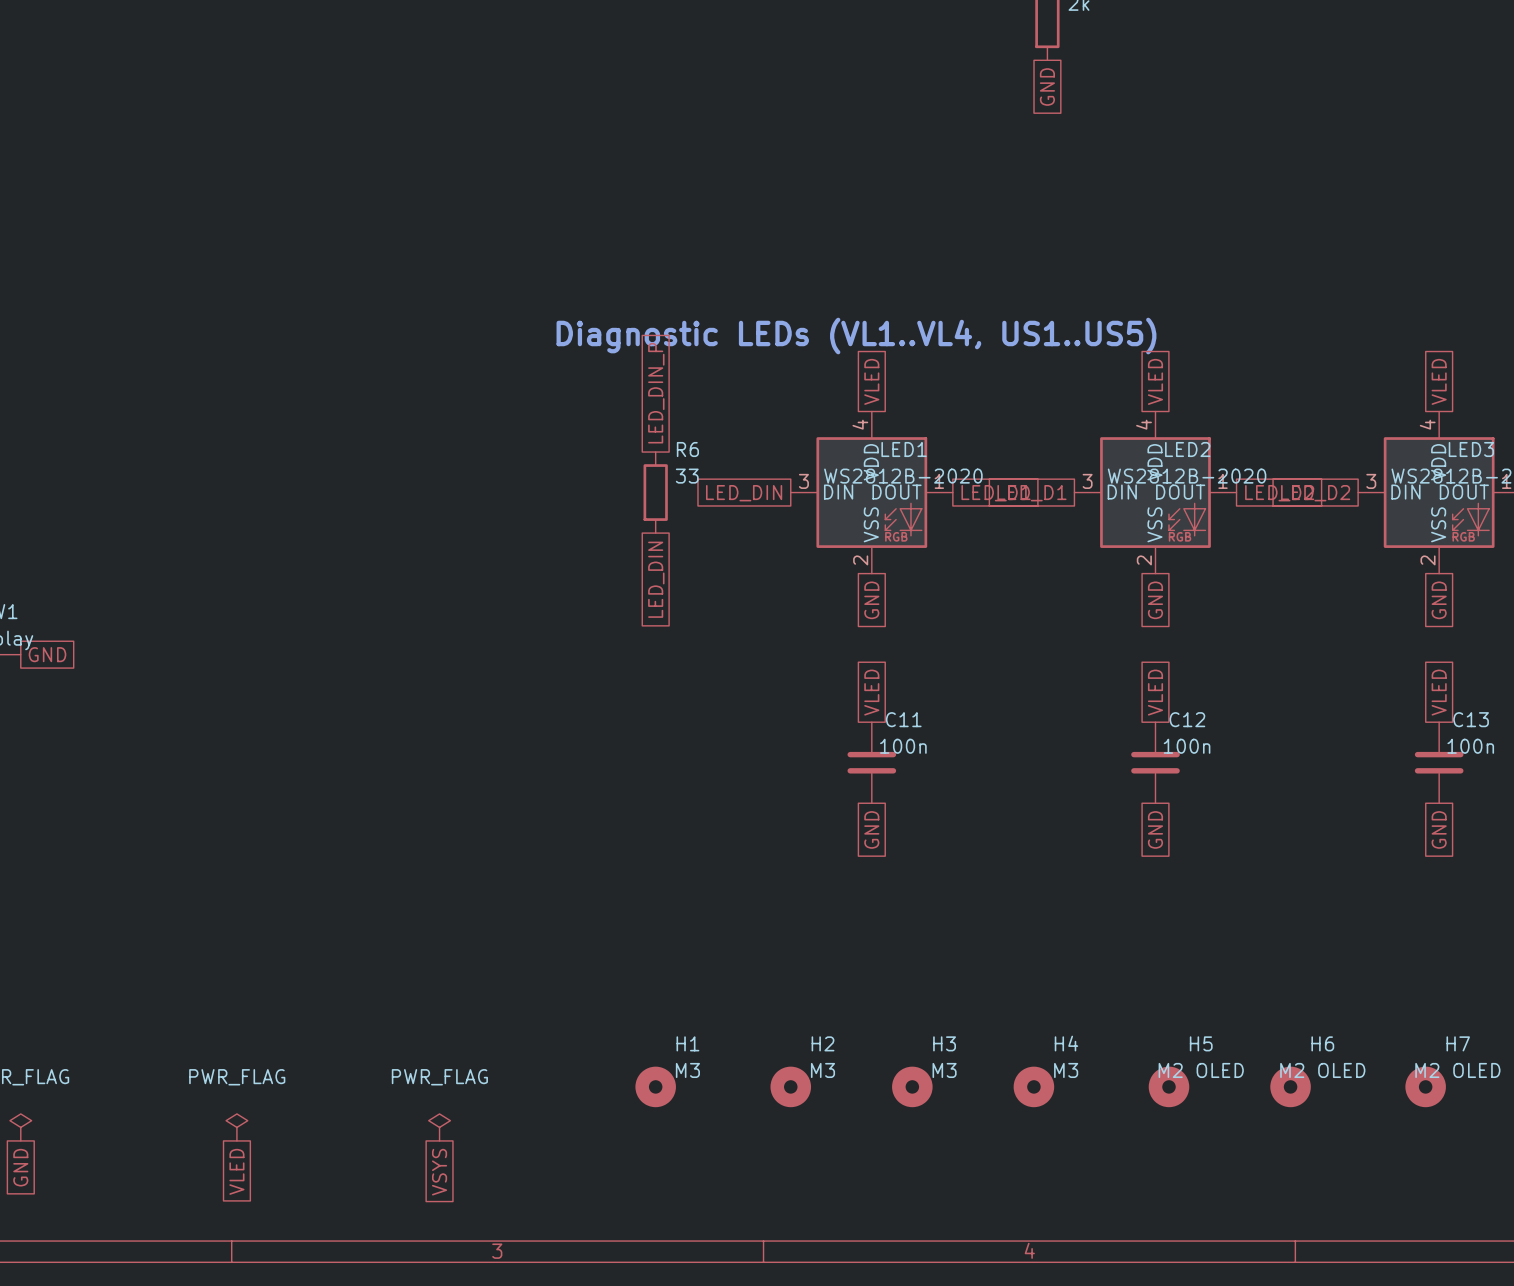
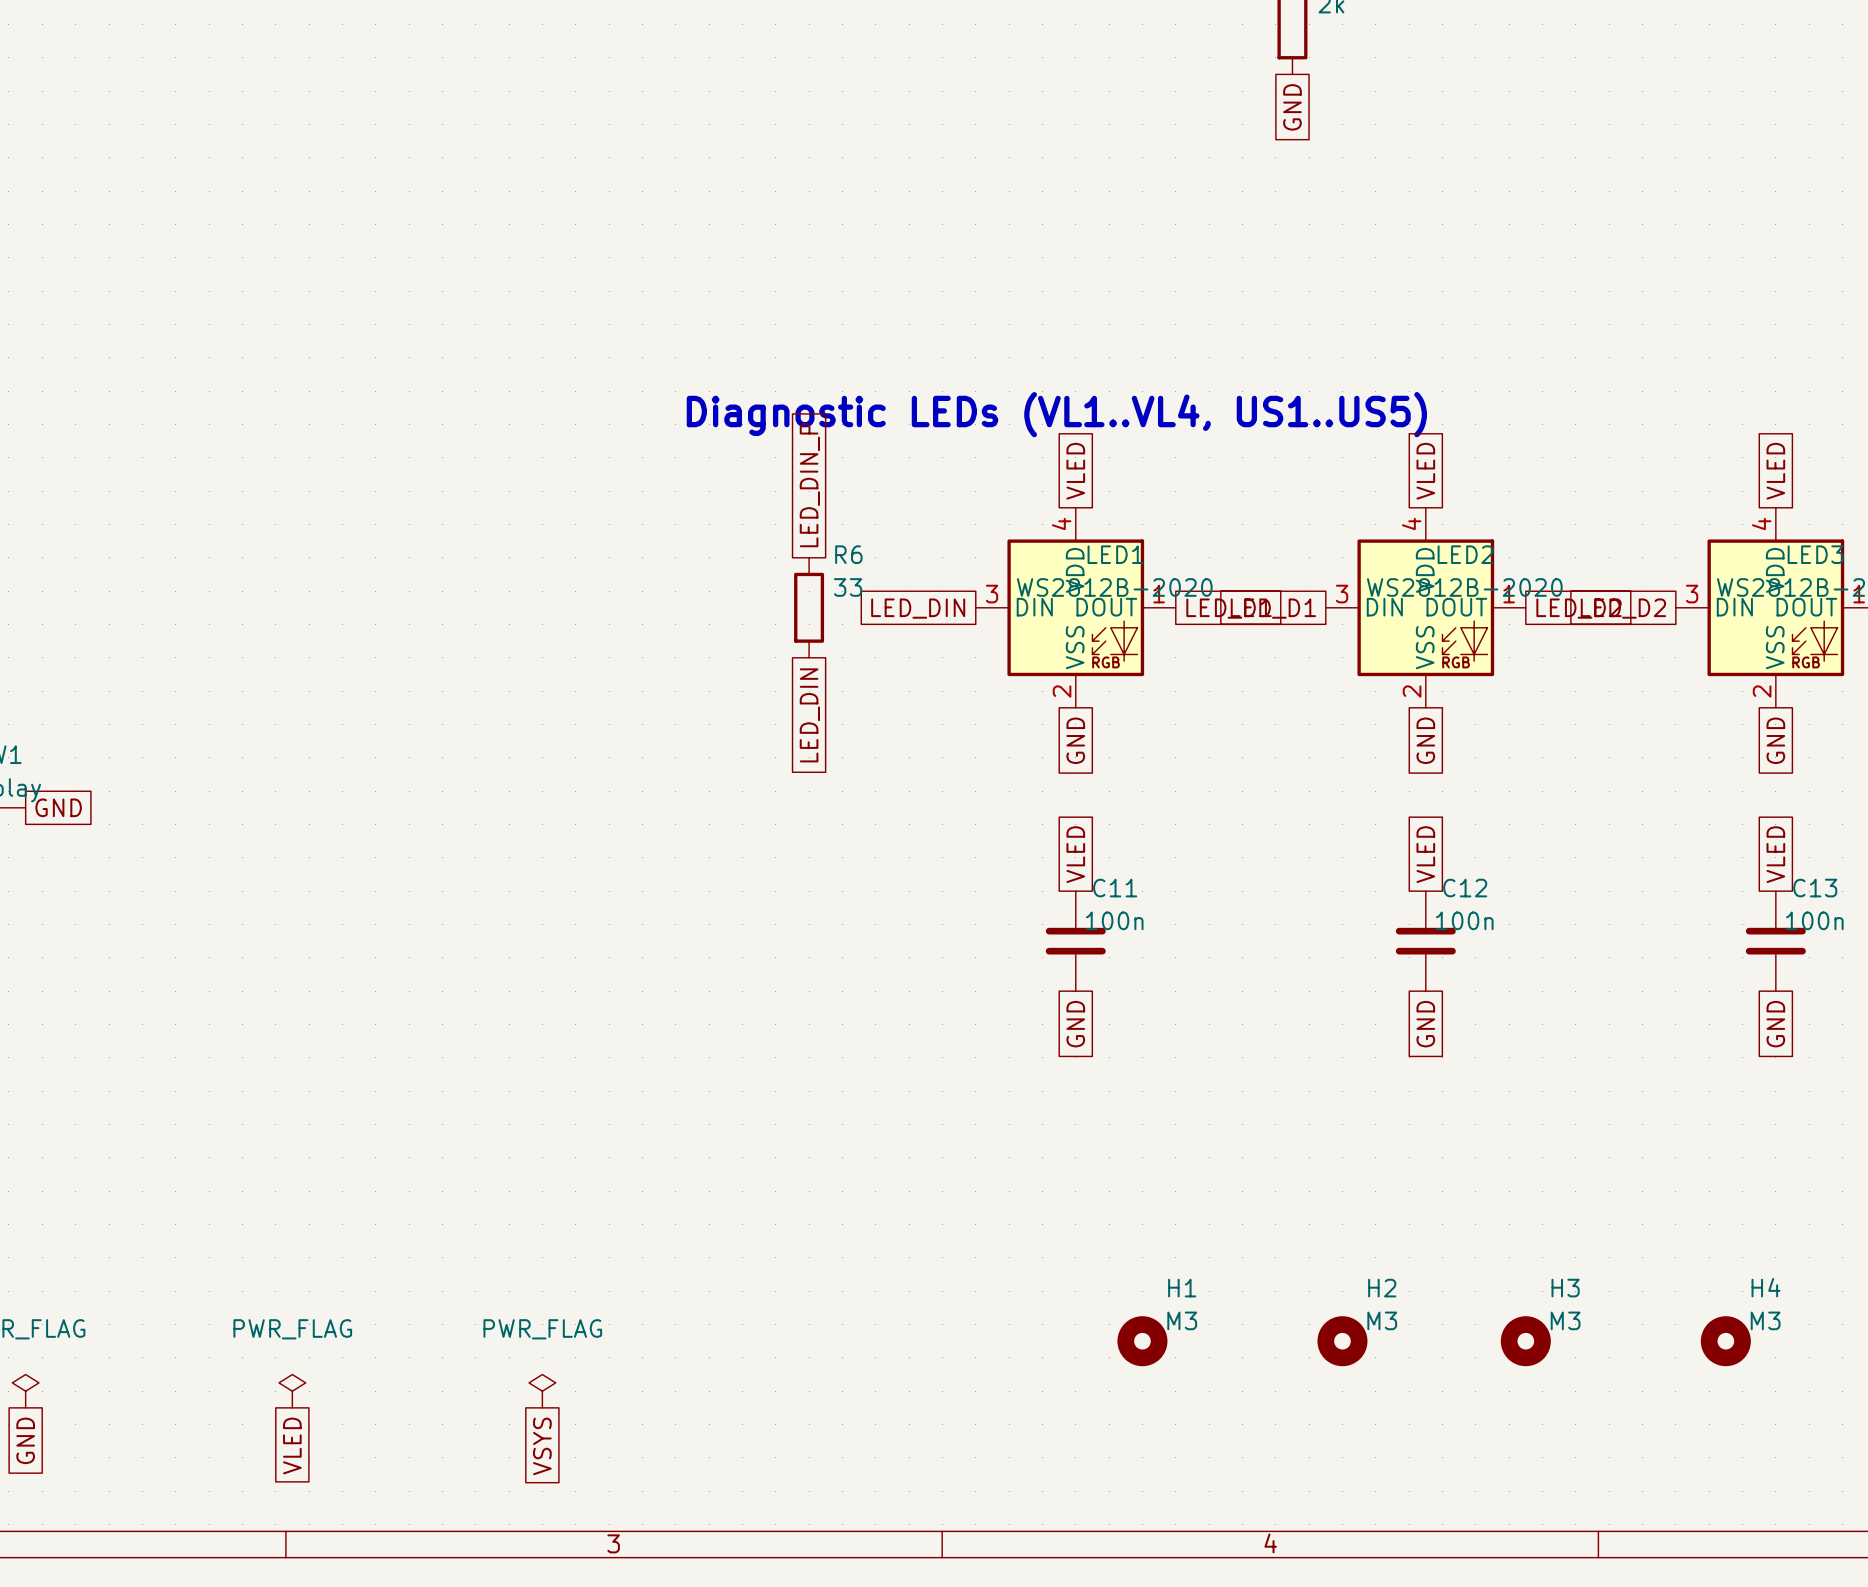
H1 position: (655, 1086) -> (1142, 1341)
H2 position: (790, 1086) -> (1342, 1341)
H3 position: (912, 1086) -> (1525, 1341)
H4 position: (1033, 1086) -> (1725, 1341)
H5: M2 OLED (1168, 1086) -> none
H6: M2 OLED (1290, 1086) -> none
H7: M2 OLED (1425, 1086) -> none

